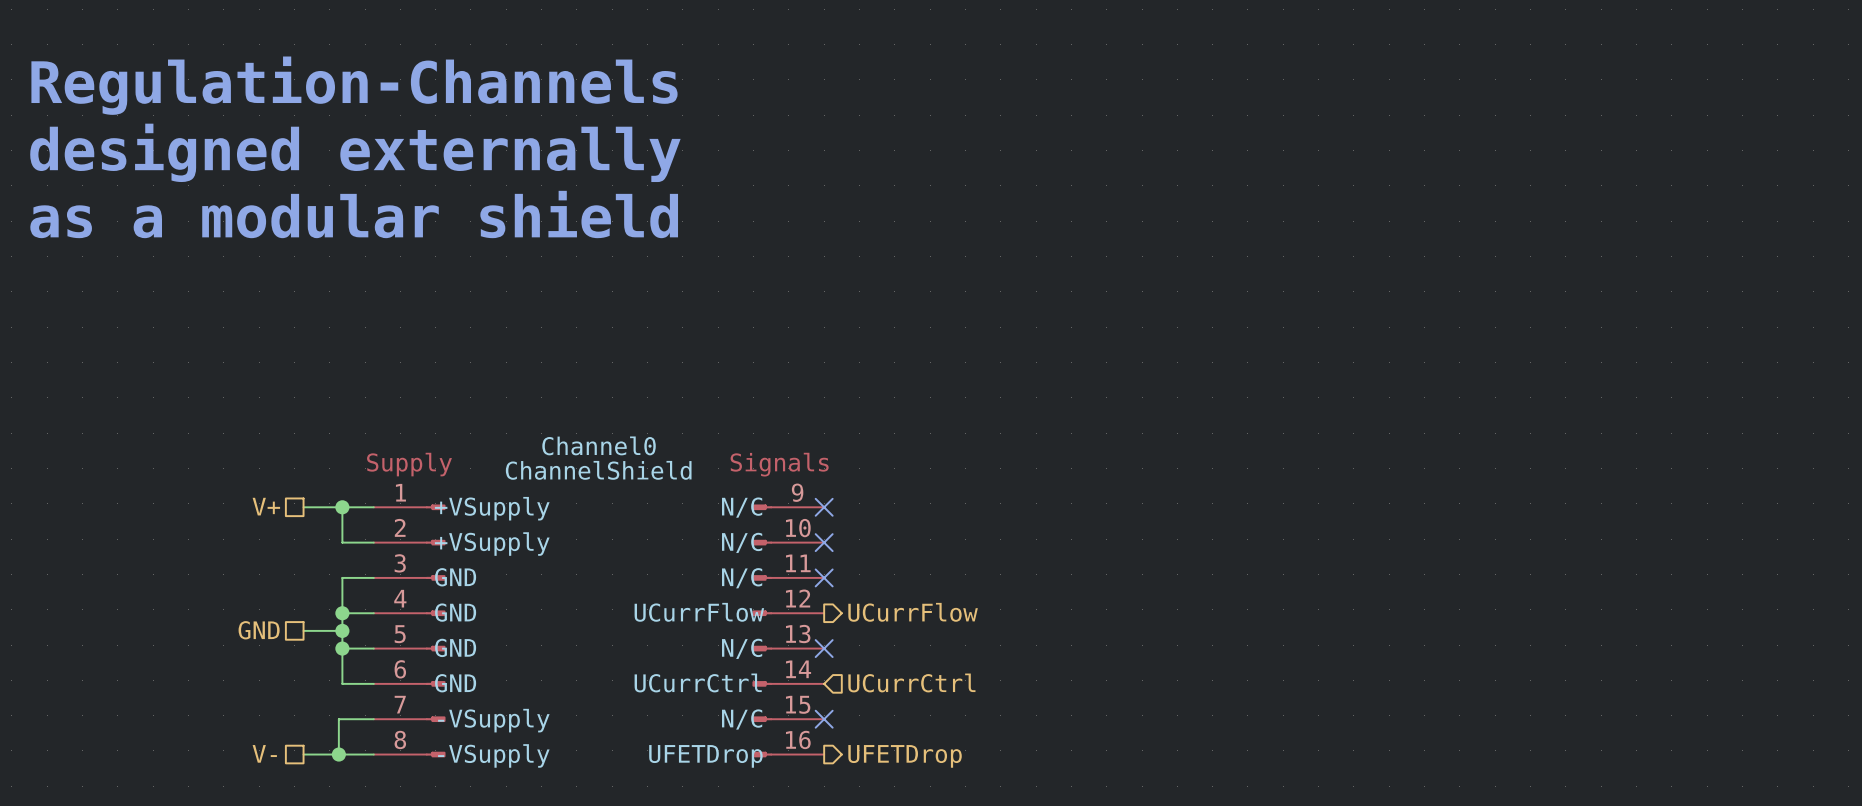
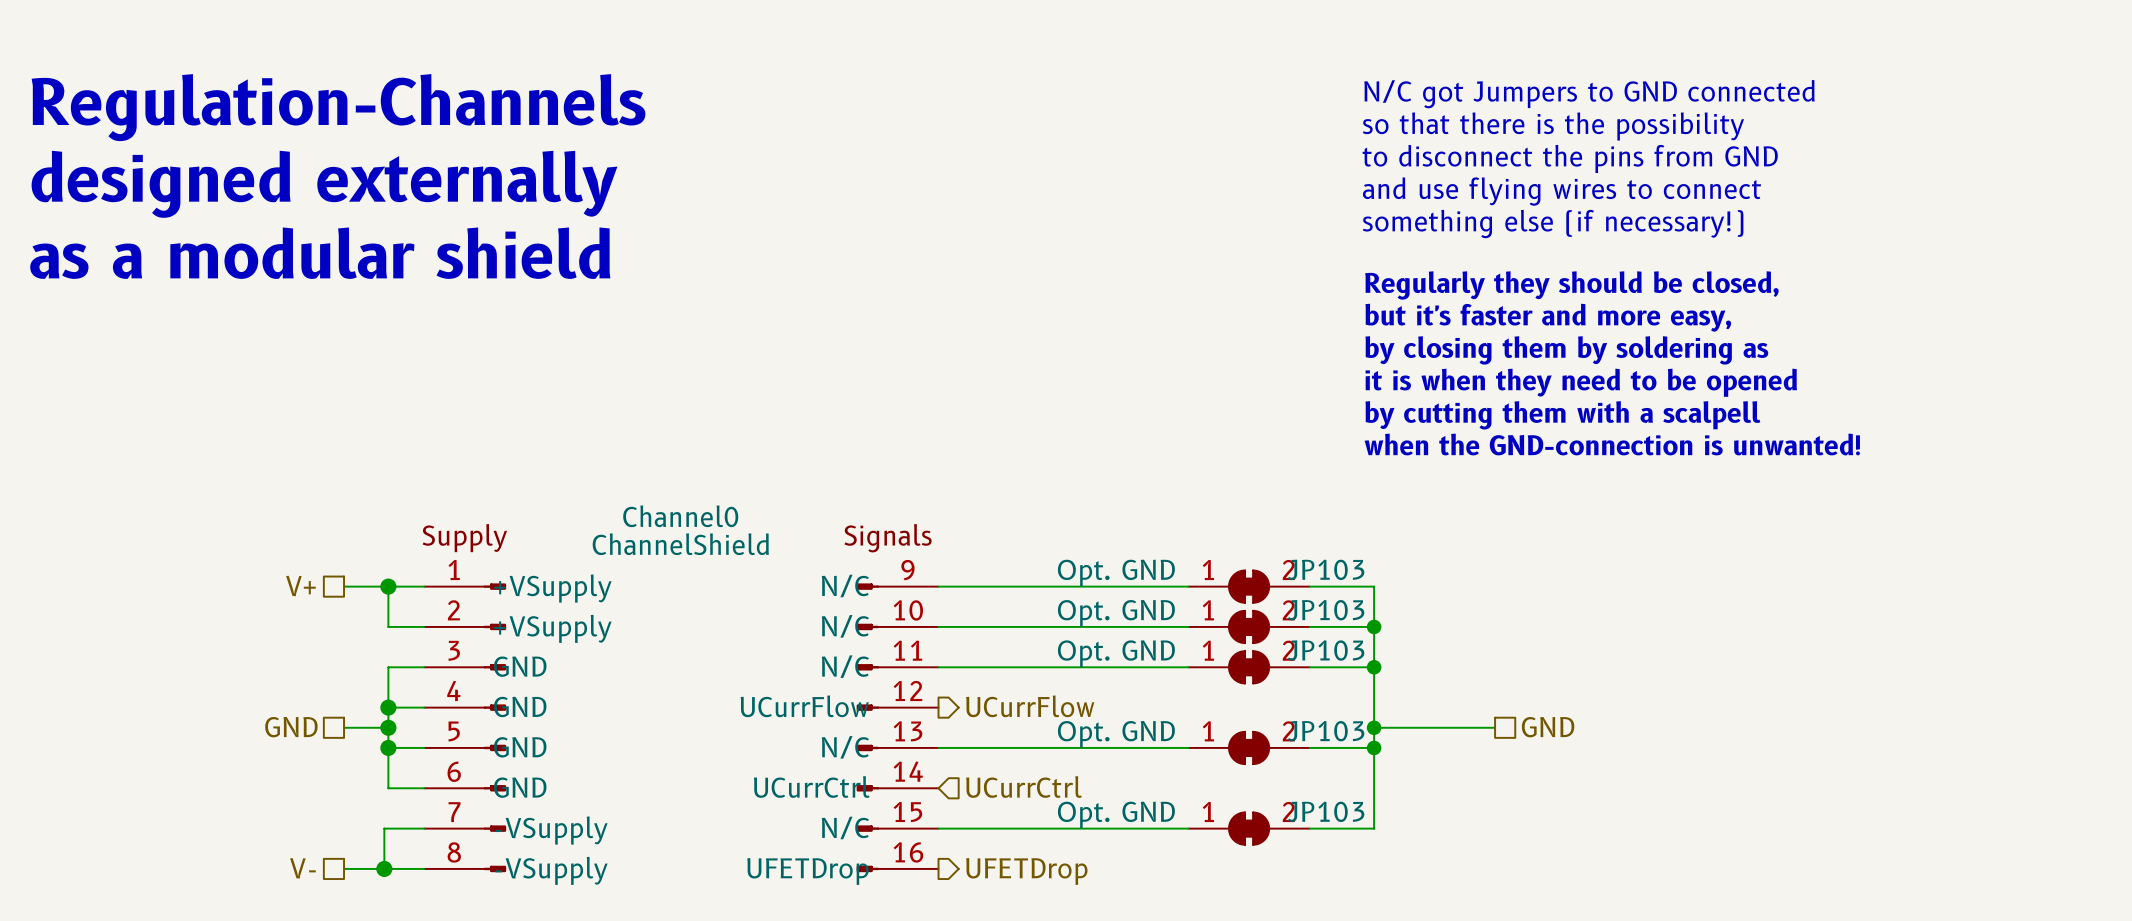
text: none -> N/C got Jumpers to GND connected (1589, 94)
text: none -> so that there is the possibility (1553, 126)
text: none -> to disconnect the pins from GND (1570, 158)
text: none -> and use flying wires to connect (1561, 191)
text: none -> something else (if necessary!) (1553, 224)
text: none -> Regularly they should be closed, (1571, 285)
text: none -> but it's faster and more easy, (1548, 317)
text: none -> by closing them by soldering as (1566, 350)
text: none -> it is when they need to be opened (1581, 382)
text: none -> by cutting them with a scalpell (1562, 415)
text: none -> when the GND-connection is unwanted! (1612, 444)
wire: none -> (938, 586) (1188, 586)
no-connect mark: (824, 507) -> none
JP103: none -> Opt. GND (1249, 586)
wire: none -> (1309, 586) (1374, 586) (1374, 828) (1309, 828)
wire: none -> (938, 626) (1188, 626)
no-connect mark: (824, 542) -> none
JP103: none -> Opt. GND (1249, 626)
wire: none -> (1309, 626) (1374, 626)
junction: none -> (1374, 626)
wire: none -> (938, 667) (1188, 667)
no-connect mark: (824, 577) -> none
JP103: none -> Opt. GND (1249, 667)
wire: none -> (1309, 667) (1374, 667)
junction: none -> (1374, 667)
wire: none -> (1374, 727) (1495, 727)
junction: none -> (1374, 727)
hierarchical label: none -> GND (1548, 727)
wire: none -> (938, 747) (1188, 747)
no-connect mark: (824, 648) -> none
JP103: none -> Opt. GND (1249, 747)
wire: none -> (1309, 747) (1374, 747)
junction: none -> (1374, 747)
wire: none -> (938, 828) (1188, 828)
no-connect mark: (824, 719) -> none
JP103: none -> Opt. GND (1249, 828)

